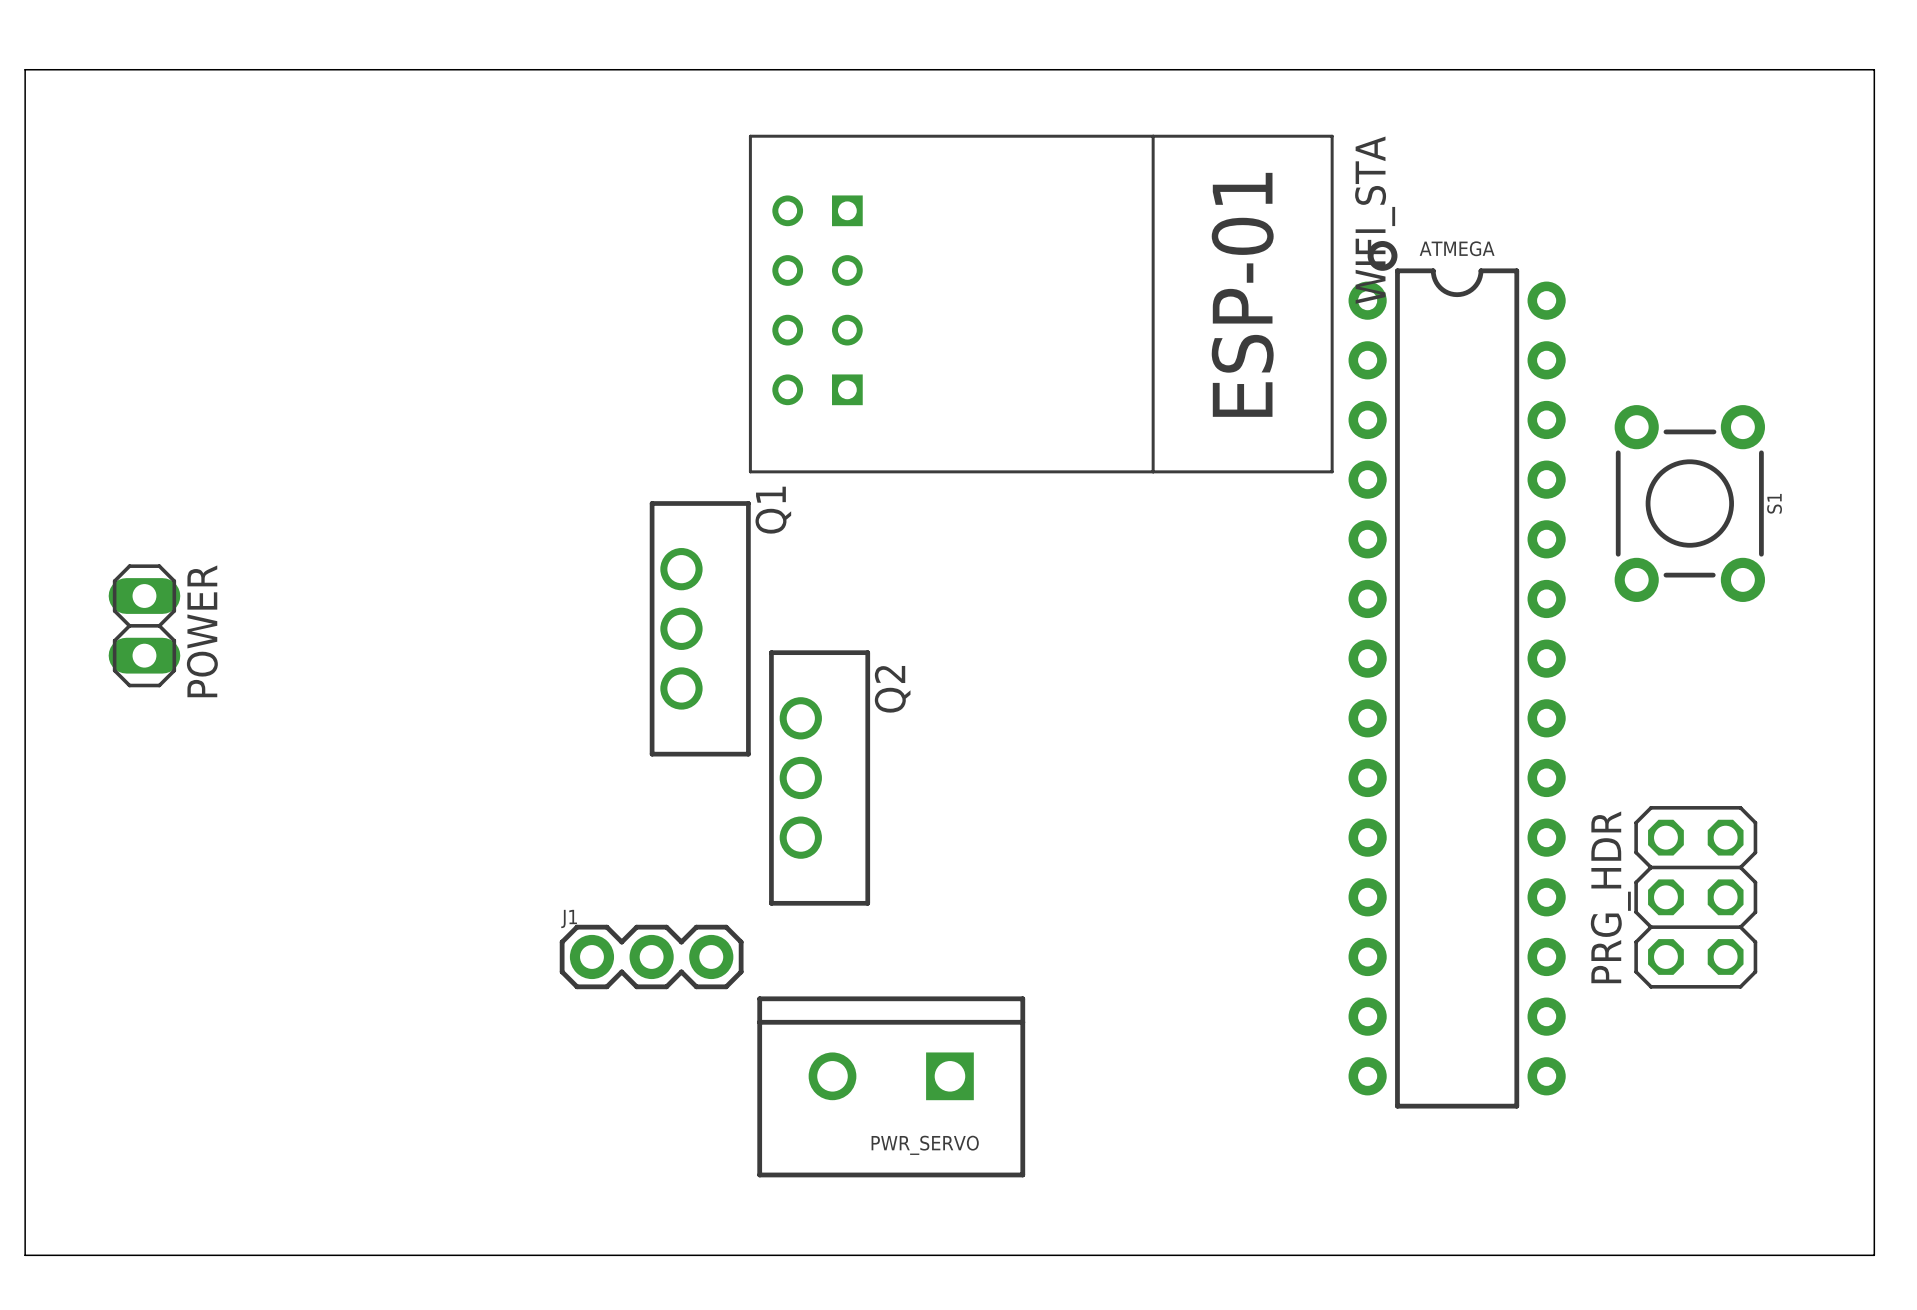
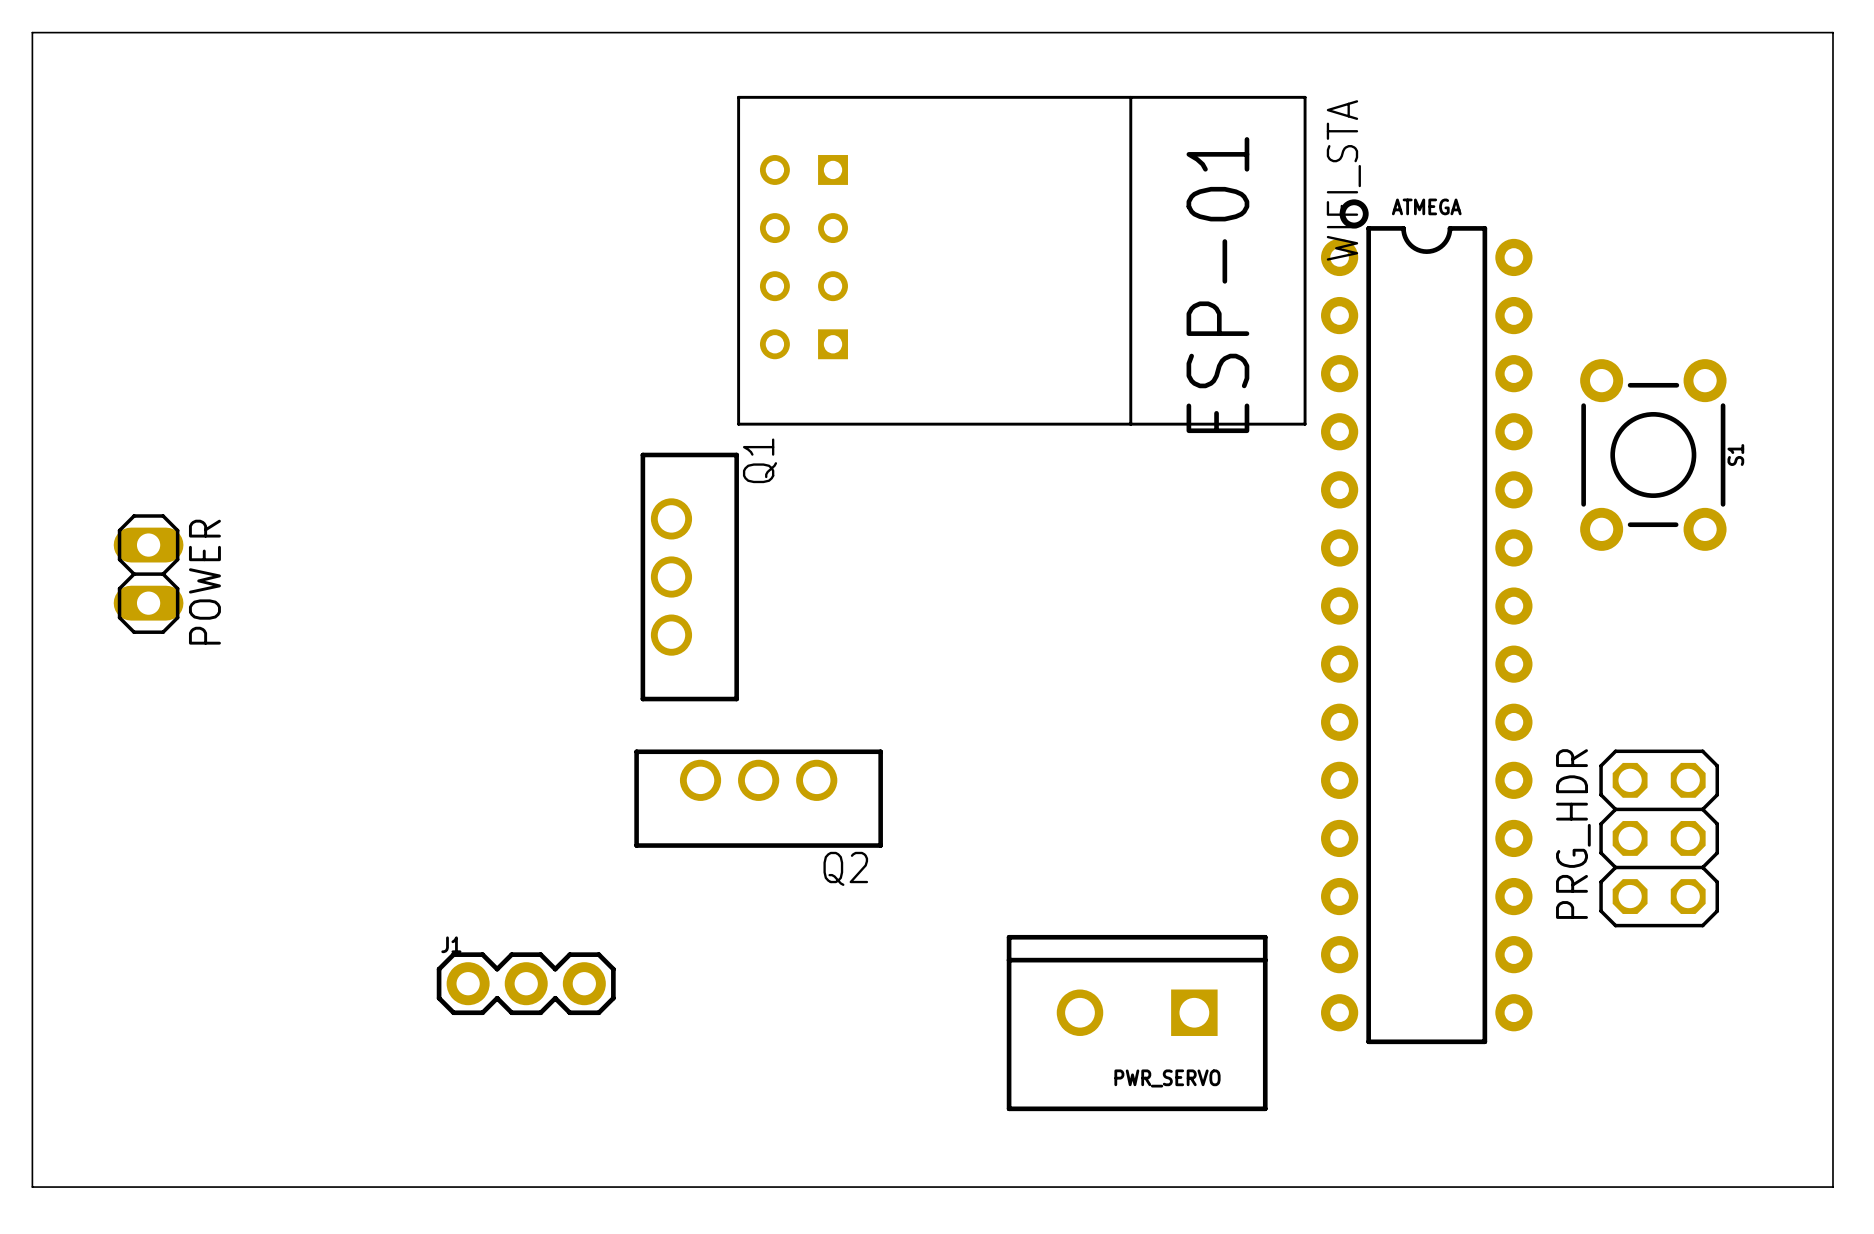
Q2 rotation: 0° (819, 777) -> 90° clockwise (758, 798)
J1 position: (651, 956) -> (526, 983)
PWR_SERVO position: (891, 1086) -> (1137, 1023)

